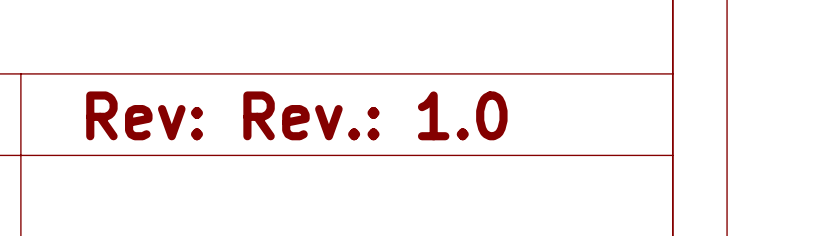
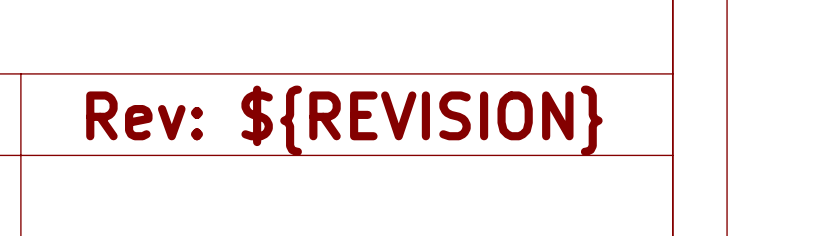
title block: Rev: Rev.: 1.0 (296, 115) -> Rev: ${REVISION} (344, 120)

